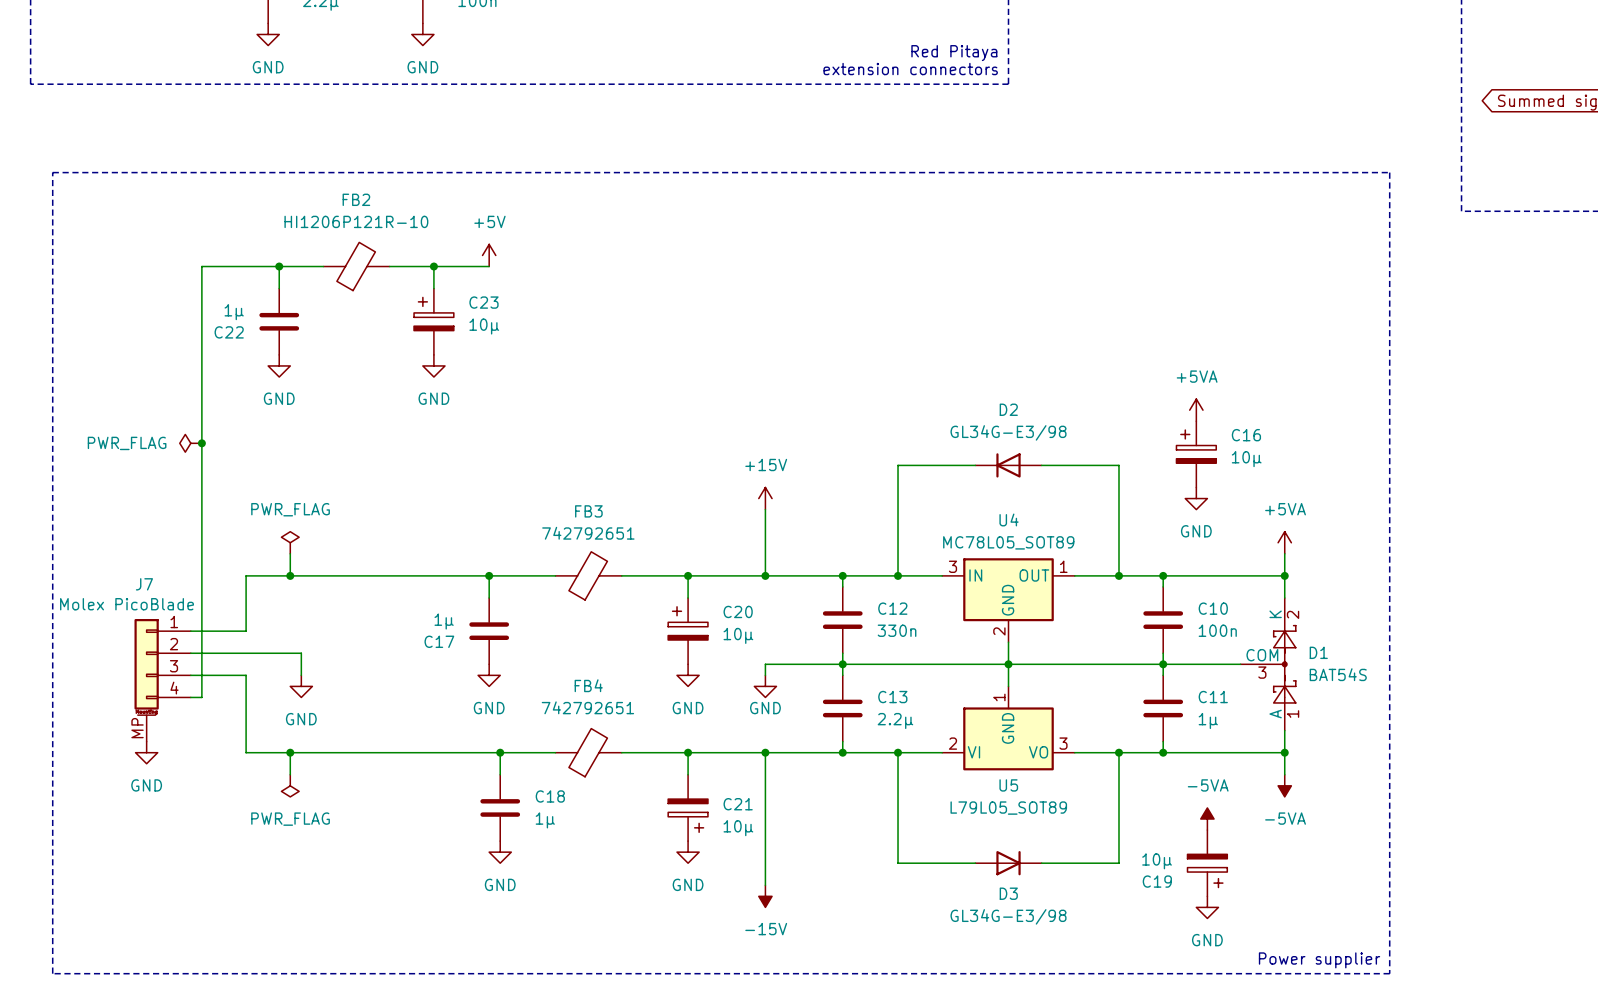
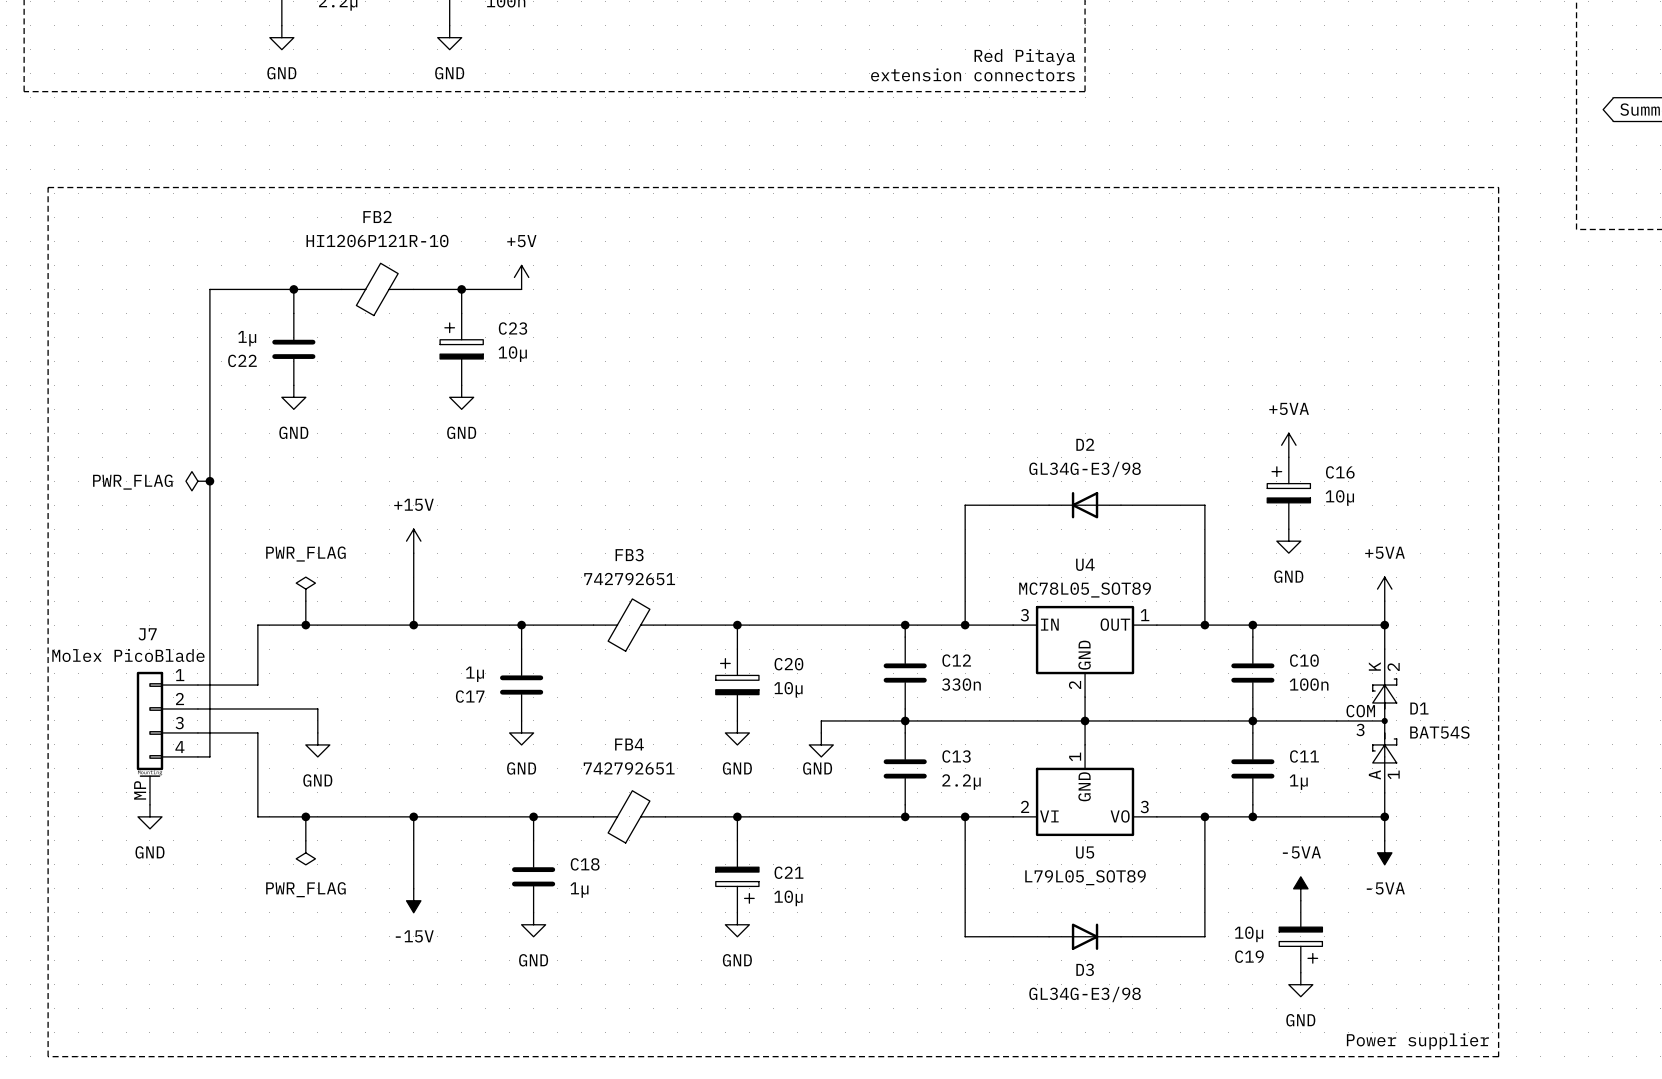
power symbol: none -> +15V (413, 541)
power symbol: +15V (765, 498) -> none
wire: none -> (413, 553) (413, 625)
wire: (765, 509) (765, 575) -> none
junction: none -> (413, 625)
junction: (765, 575) -> none
wire: none -> (413, 816) (413, 888)
junction: none -> (413, 816)
wire: (765, 752) (765, 885) -> none
junction: (765, 752) -> none
power symbol: none -> -15V (413, 900)
power symbol: -15V (765, 896) -> none

